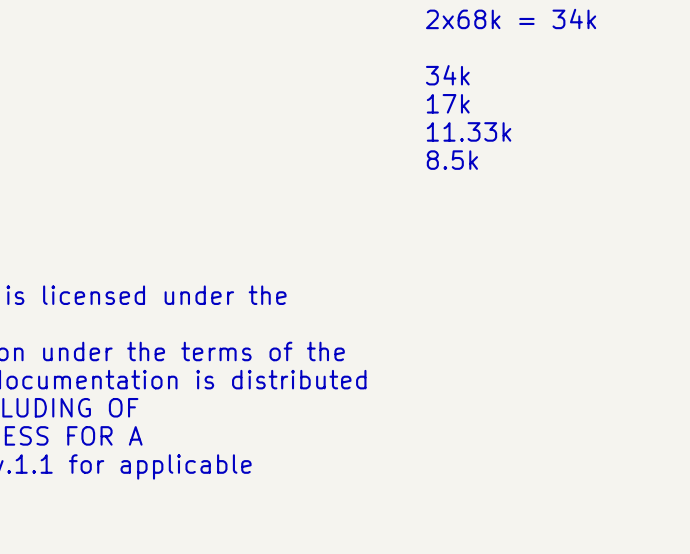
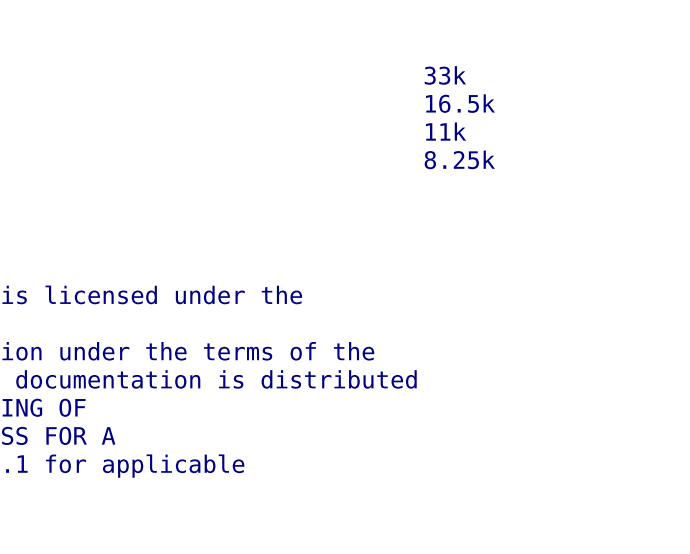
text: 2x68k = 34k (511, 18) -> none
text: 34k (447, 75) -> 33k (445, 75)
text: 17k (448, 103) -> 16.5k (460, 103)
text: 11.33k (469, 131) -> 11k (446, 131)
text: 8.5k (452, 160) -> 8.25k (459, 159)

